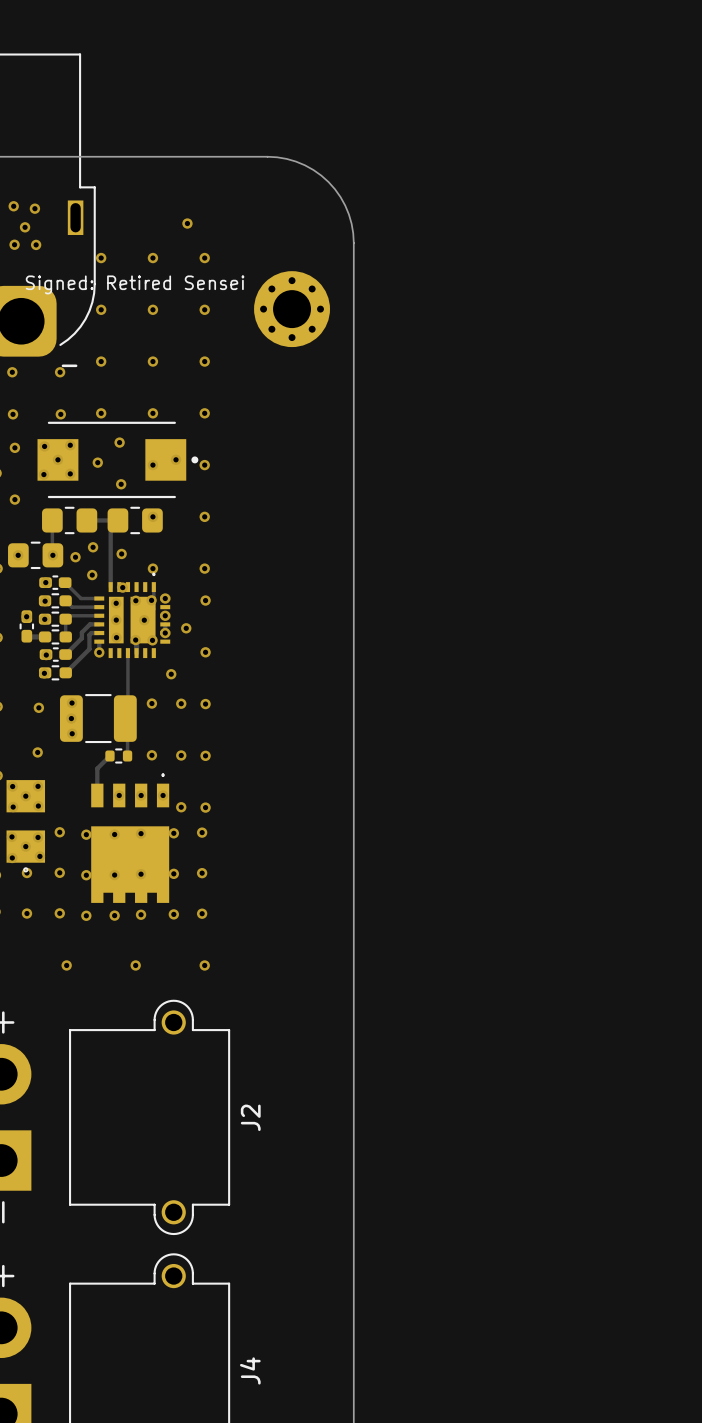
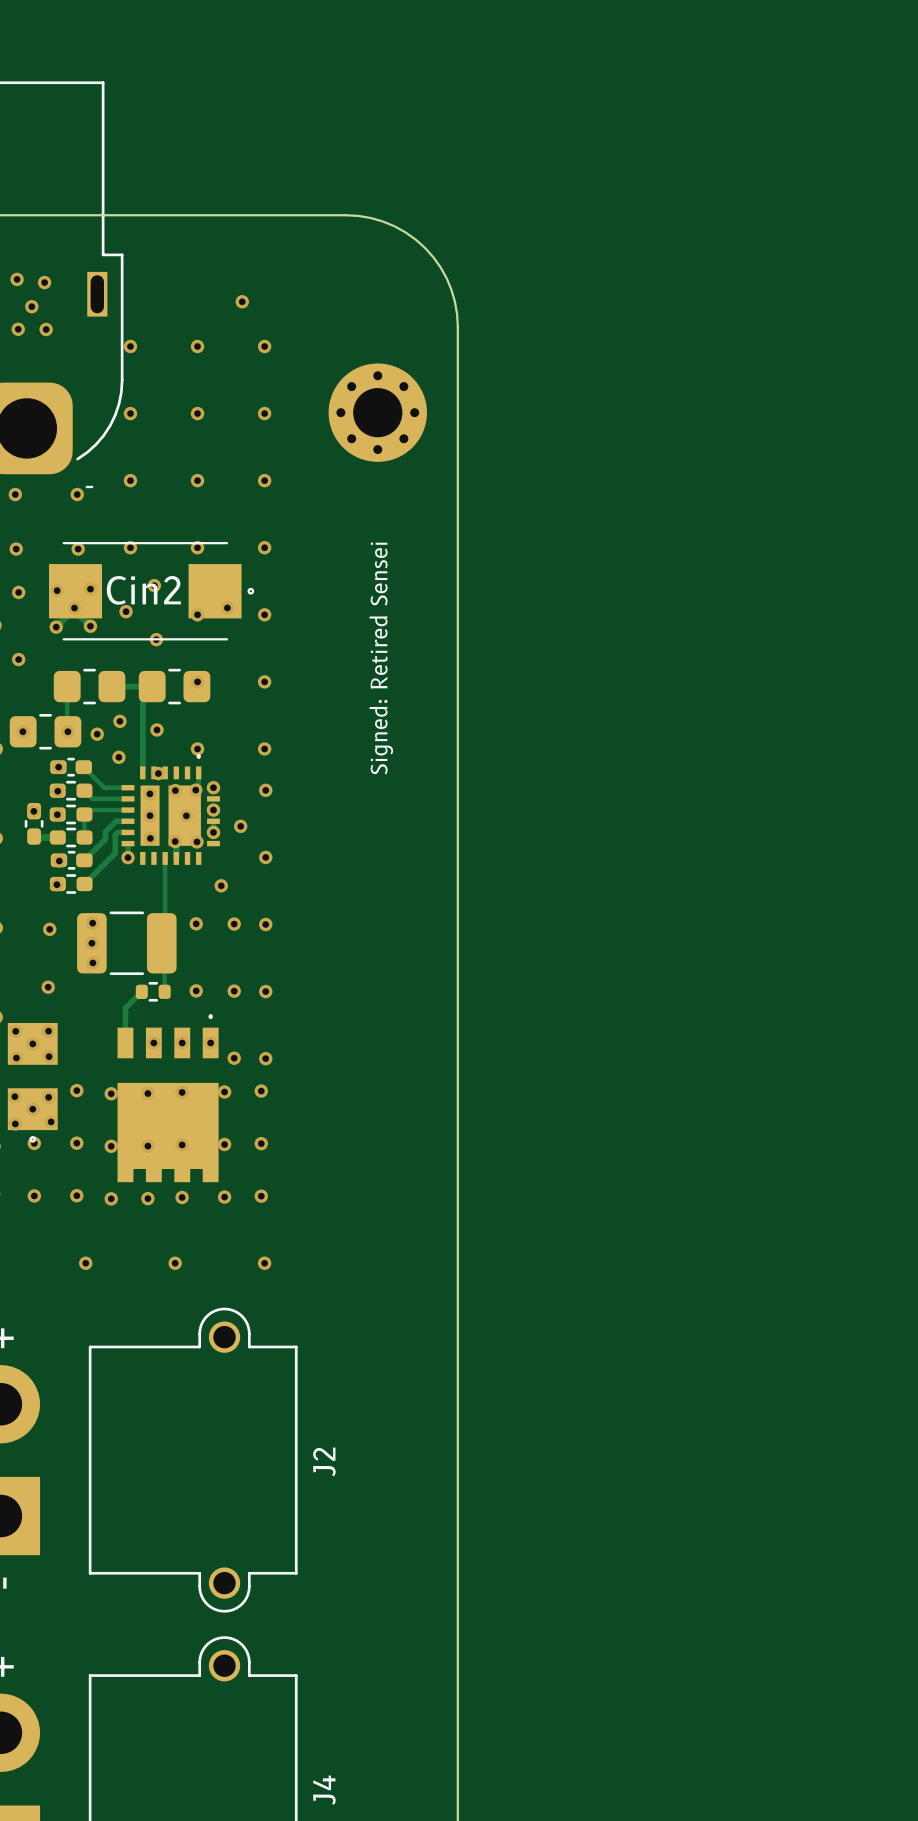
text rotation: 0° (135, 284) -> 90° counterclockwise (381, 658)
Cin2: none -> (151, 591)
part: (117, 459) -> none

